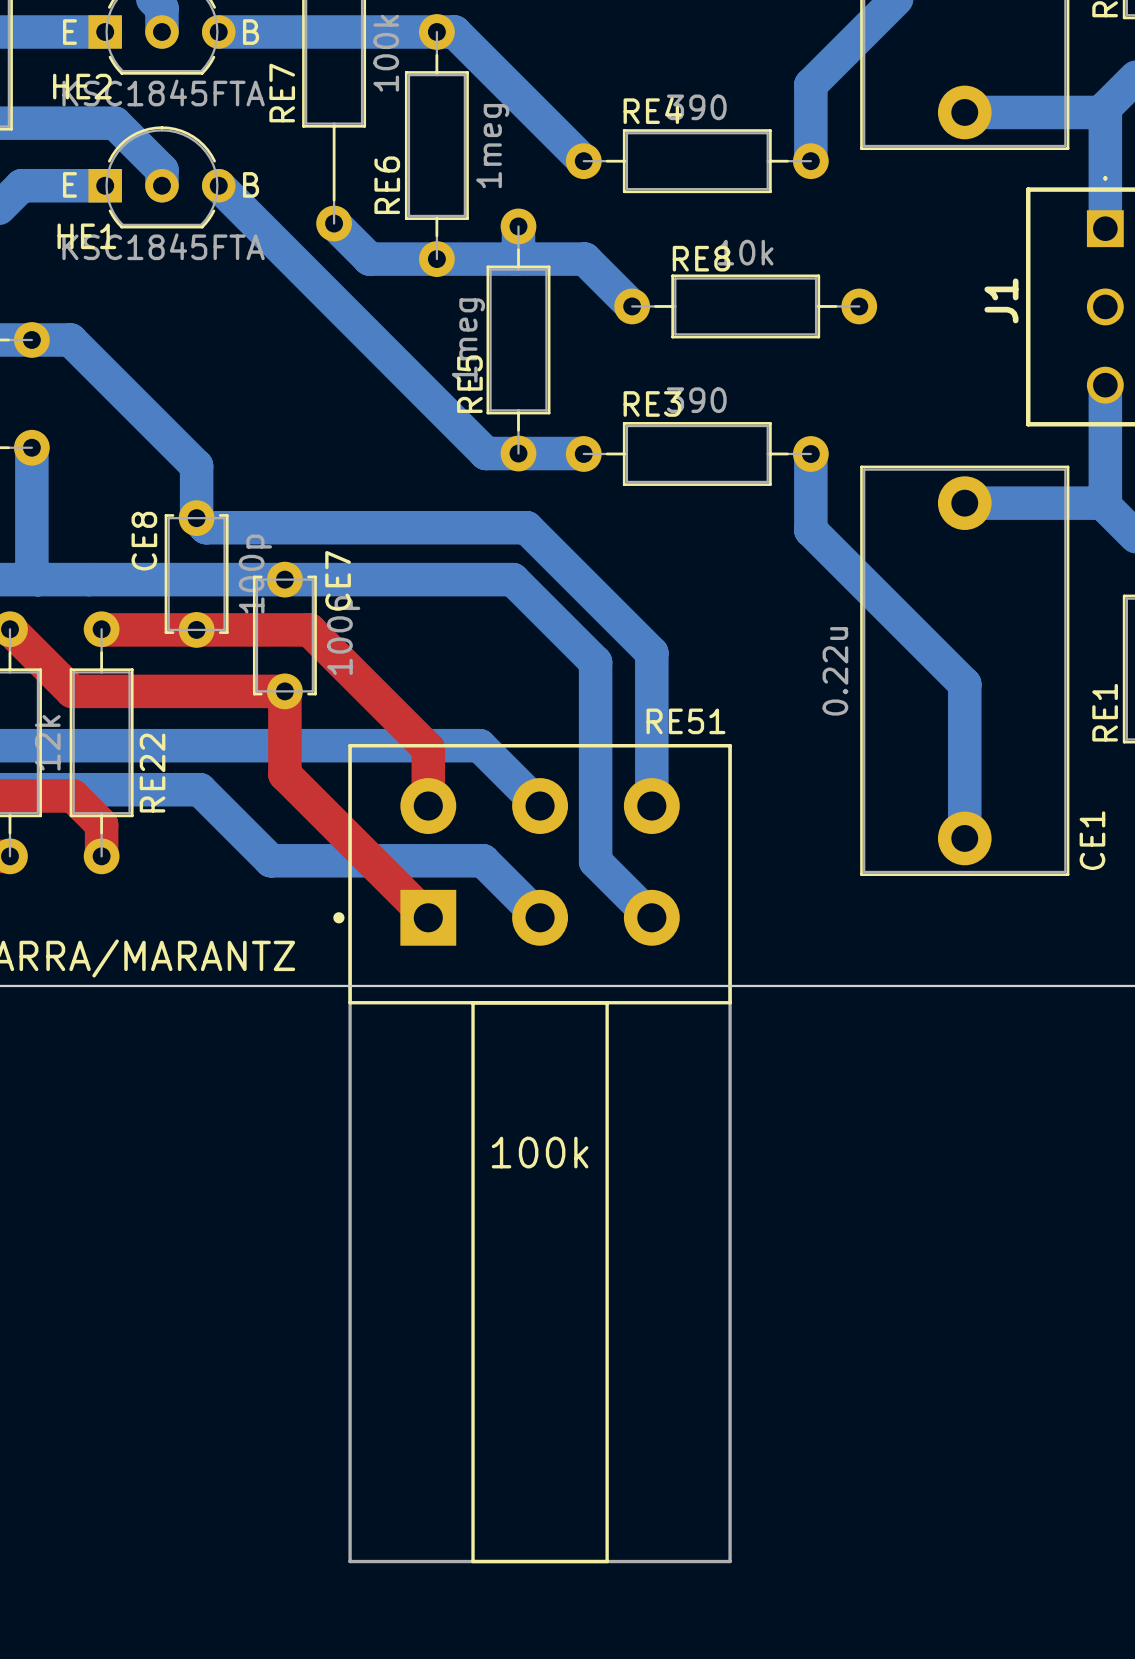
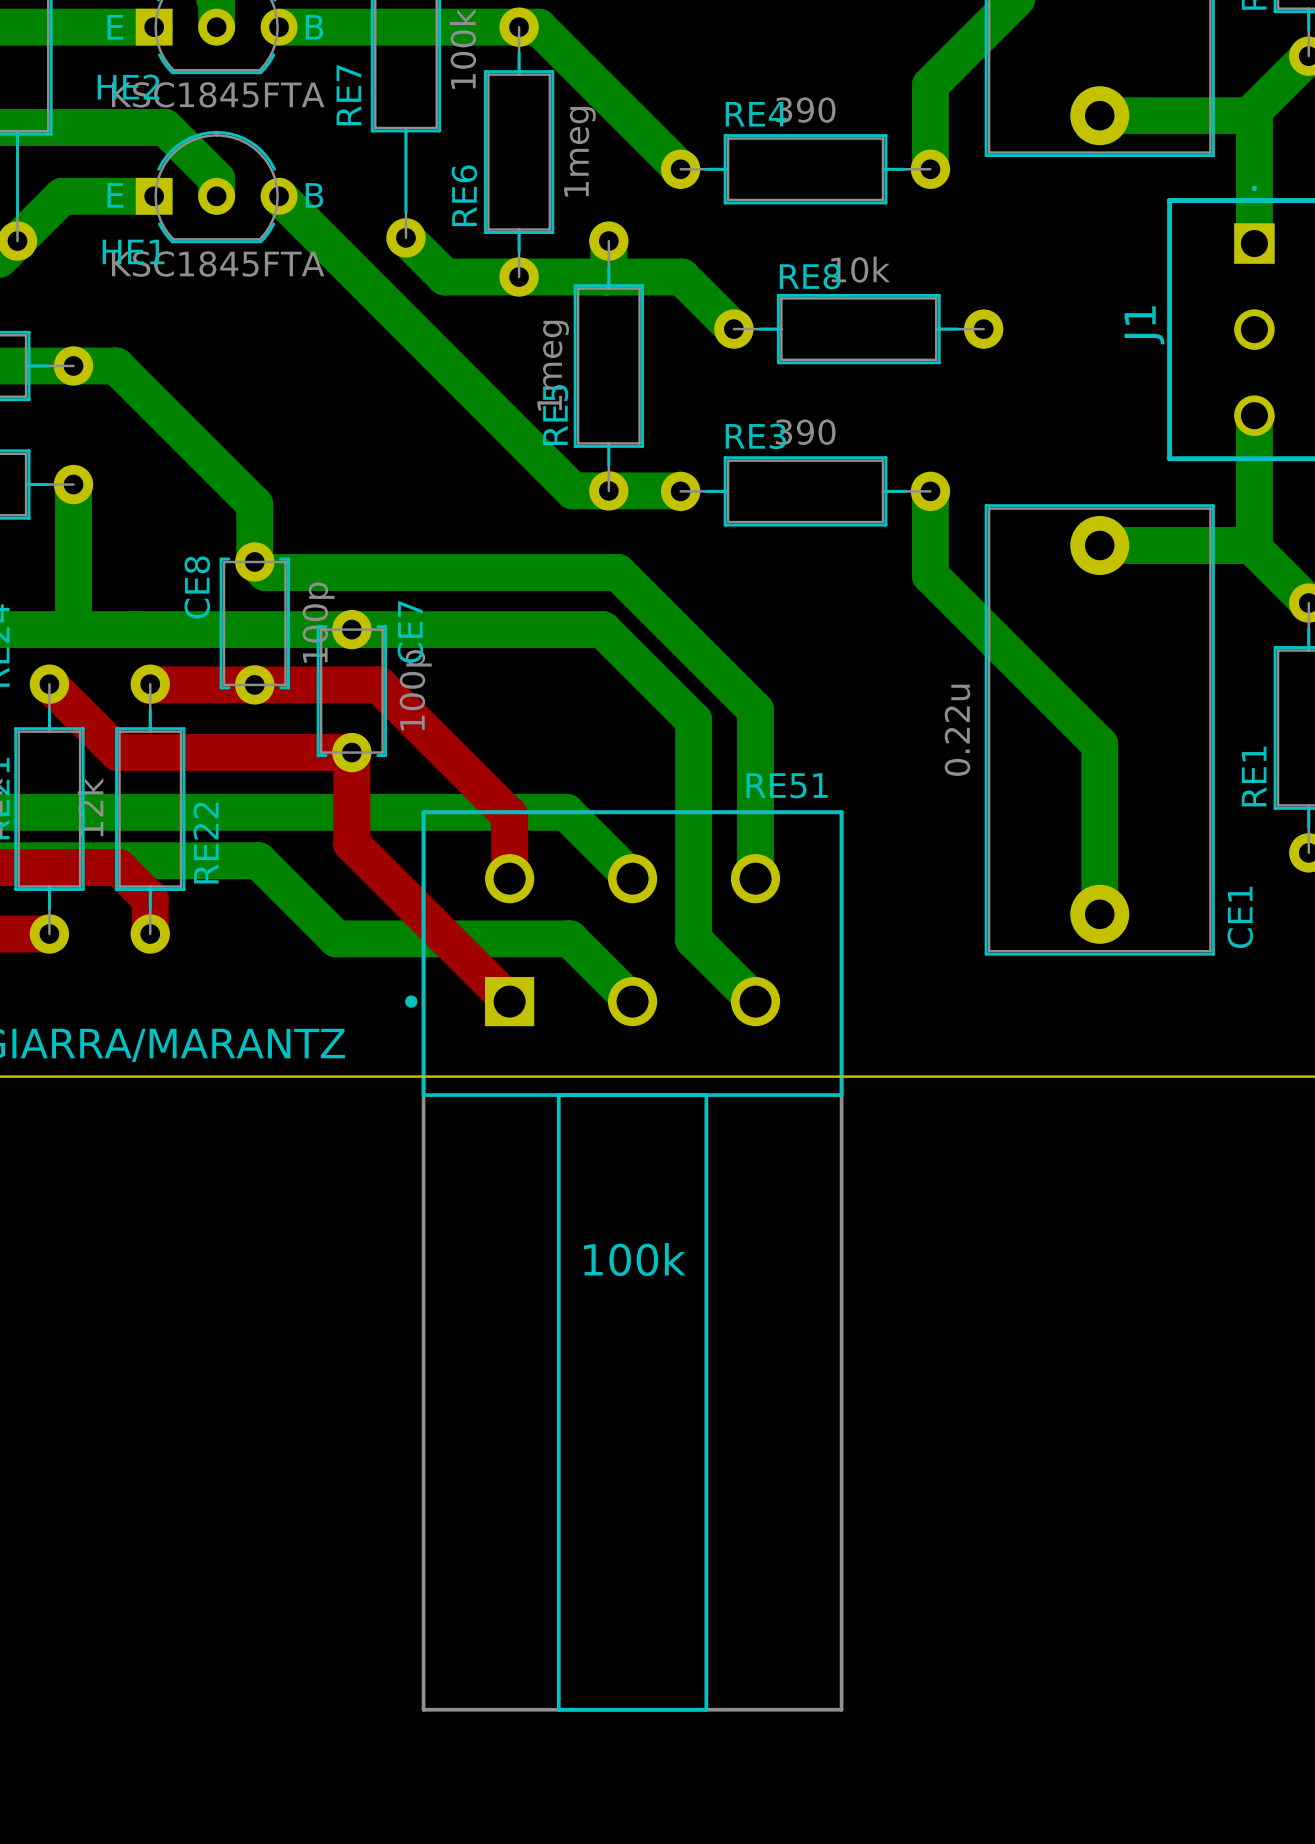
RE51 footprint: [333, 744, 732, 1564] -> [405, 810, 844, 1712]

